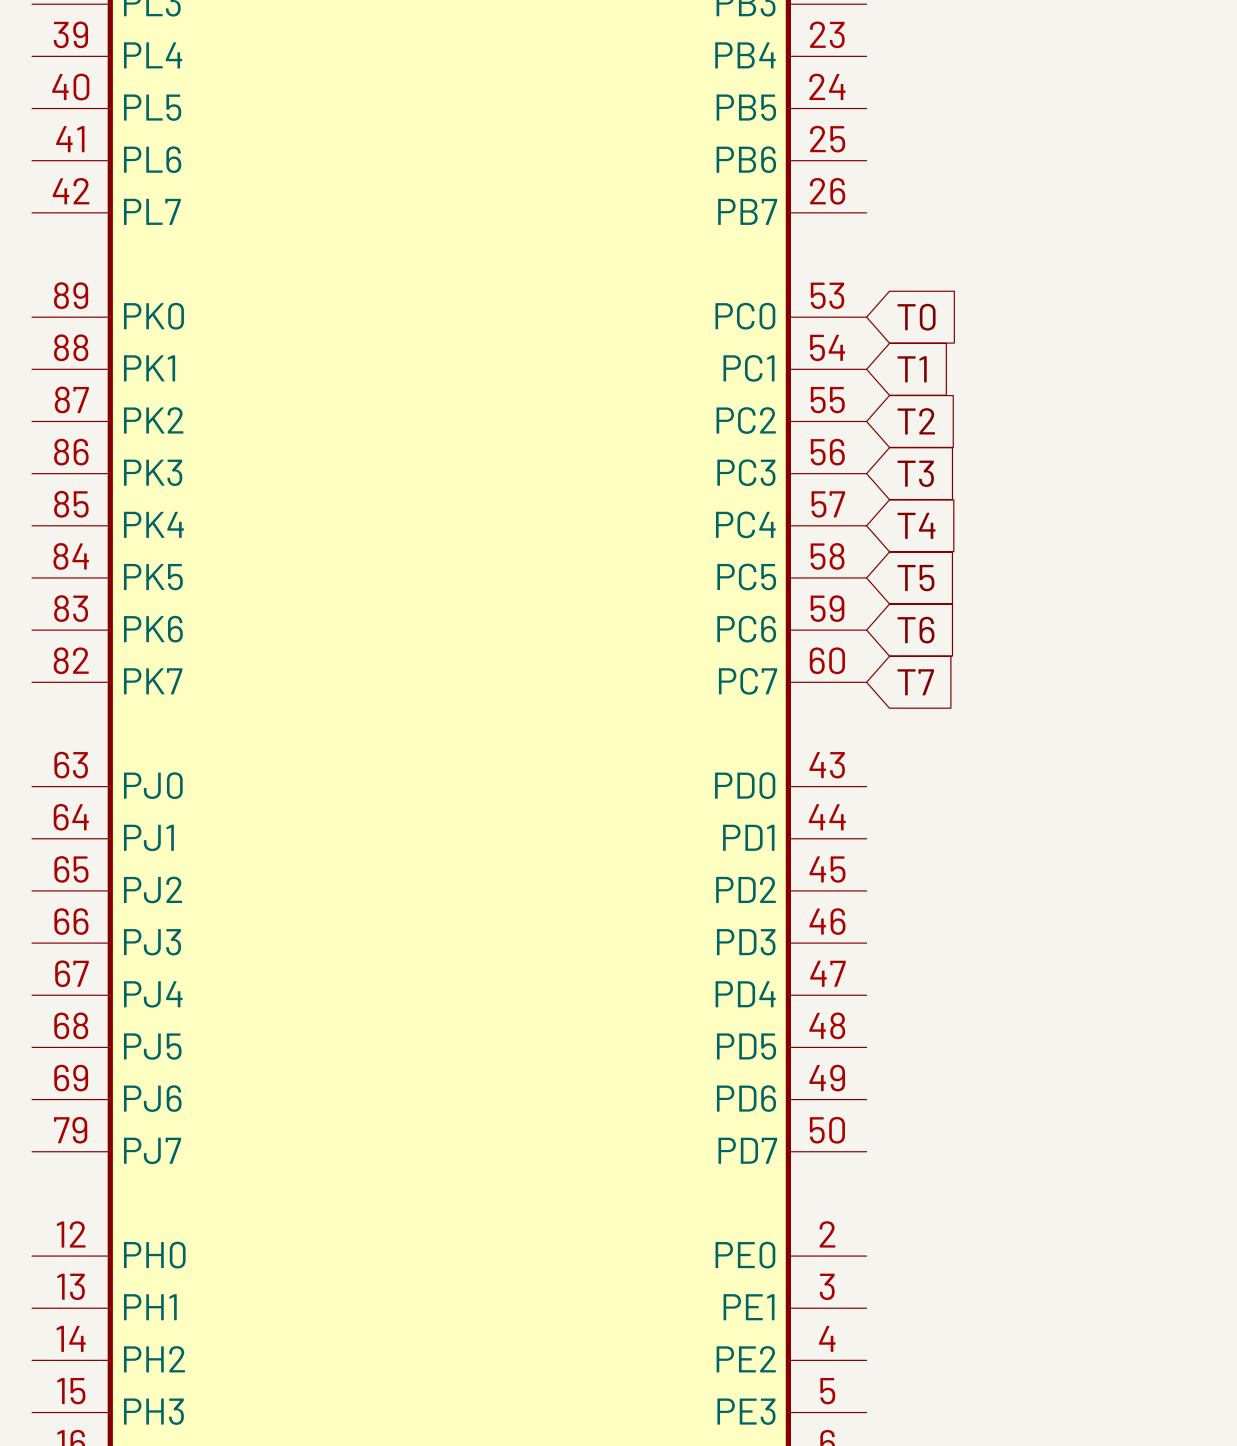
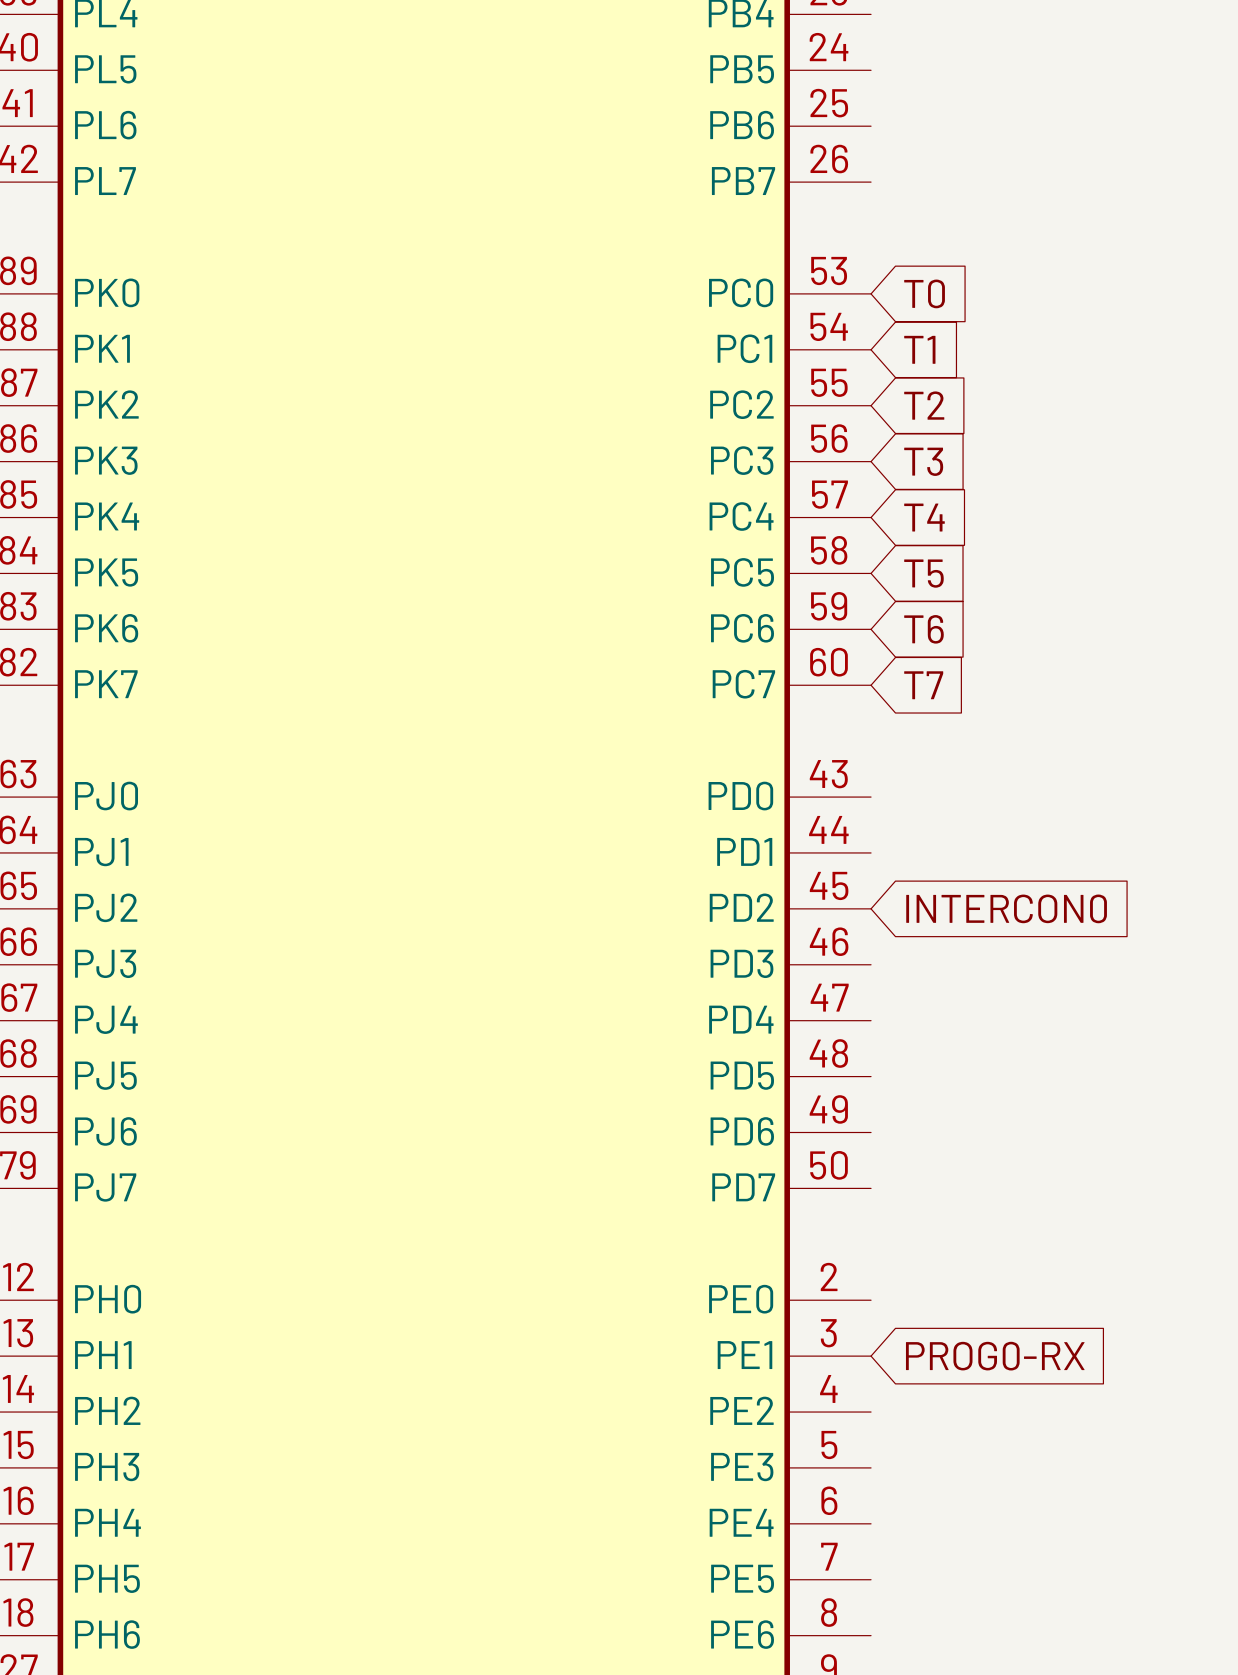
global label: none -> INTERCON0 (1006, 908)
global label: none -> PROG0-RX (995, 1356)

